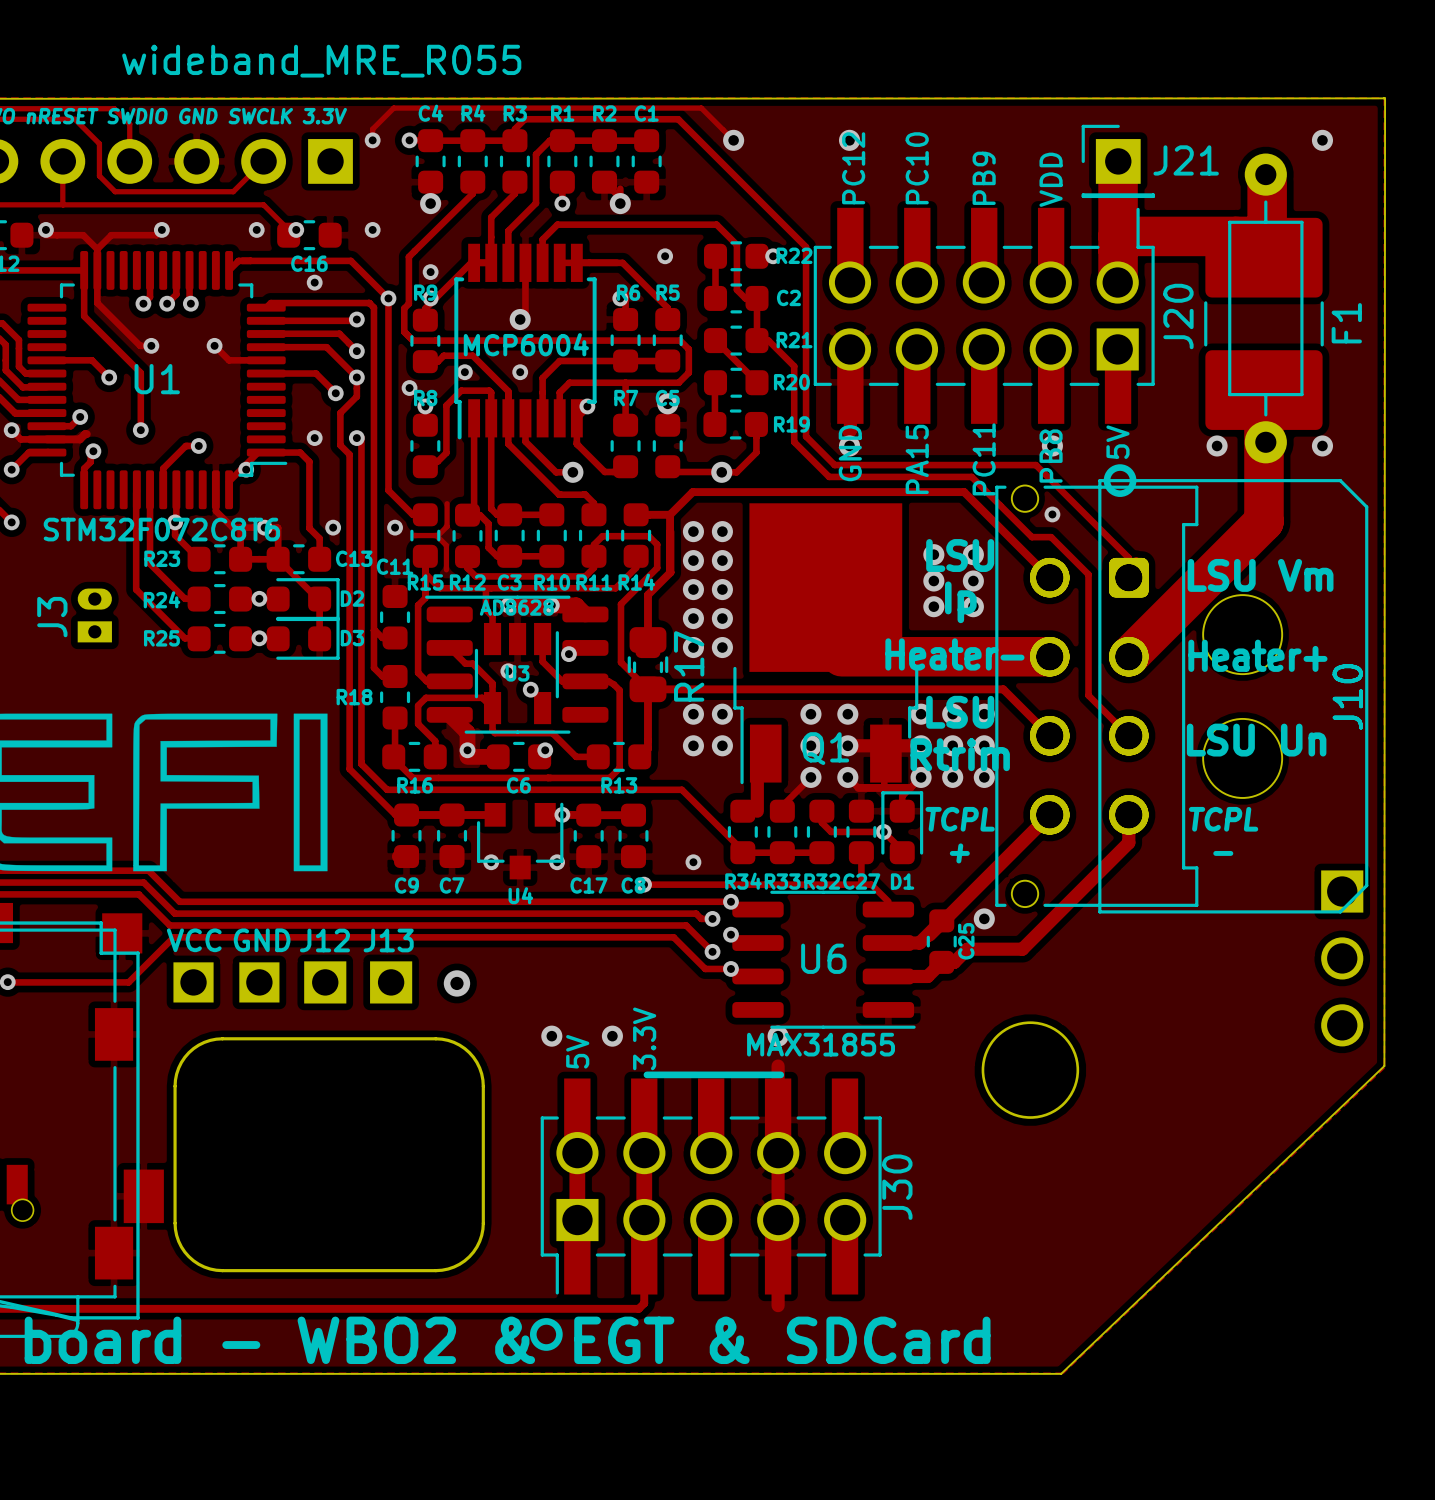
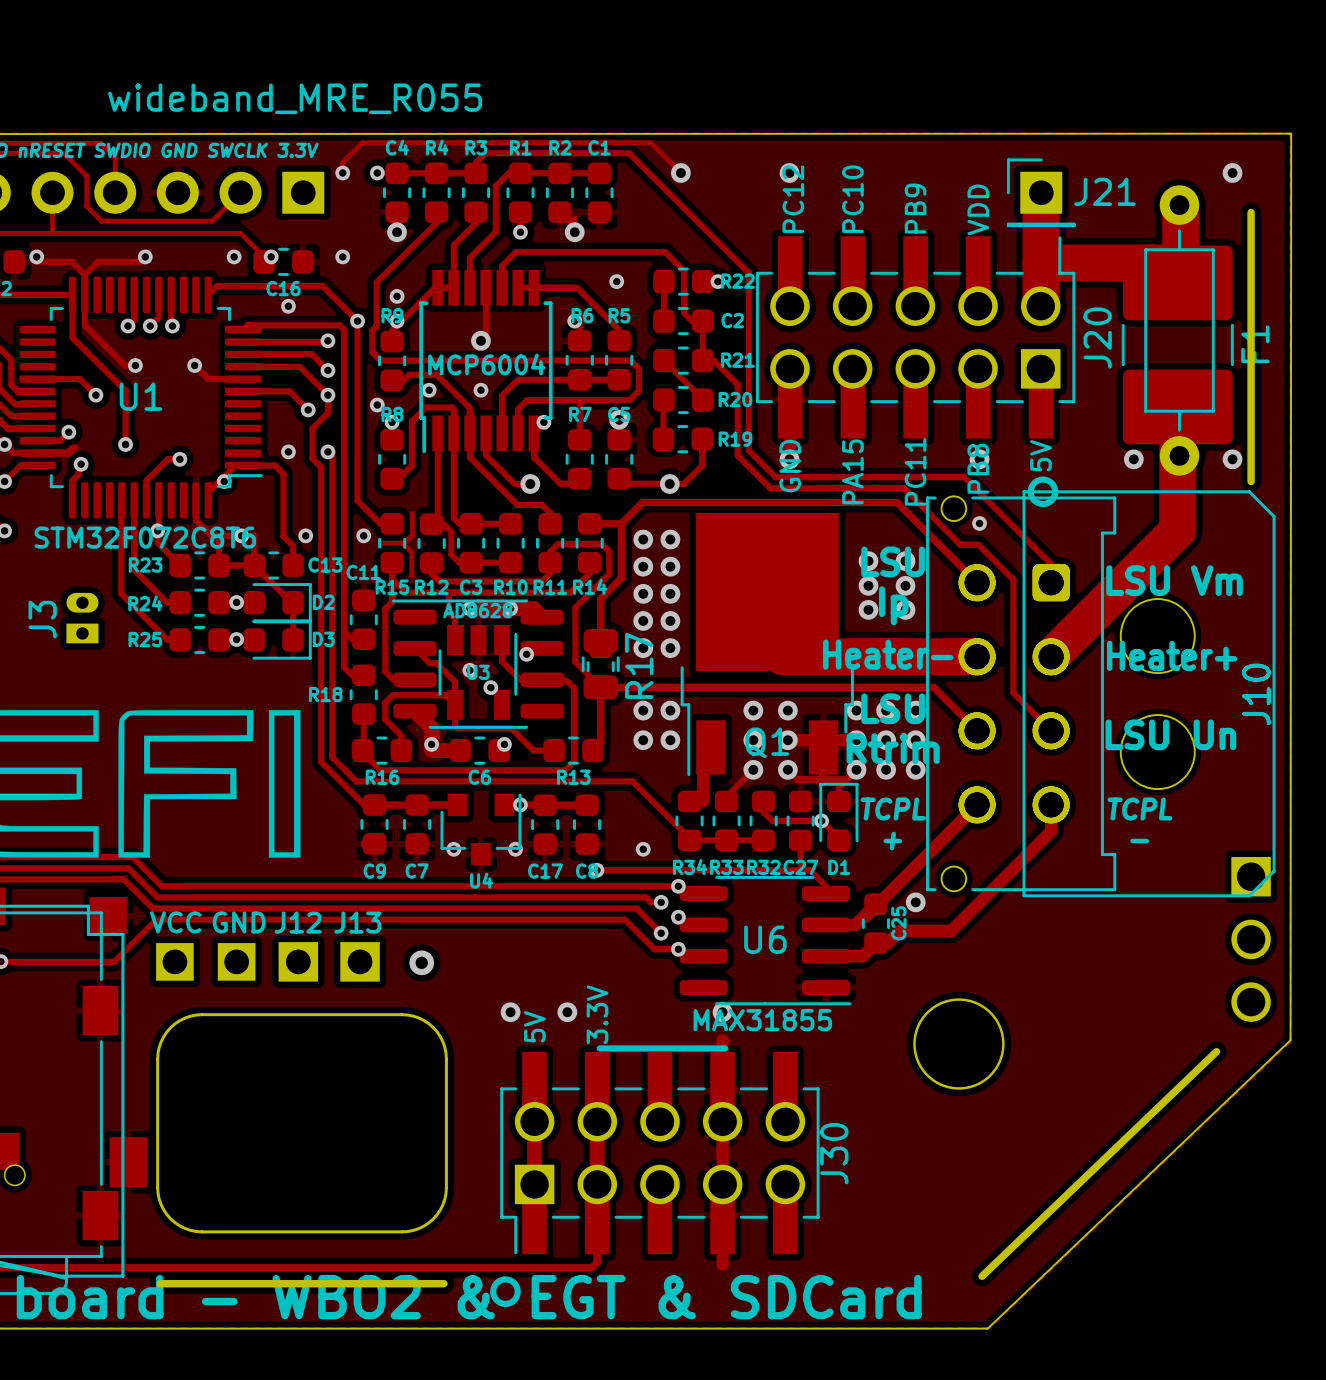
board edge: none -> (1251, 212) (1251, 481)
board edge: none -> (1216, 1051) (982, 1276)
board edge: none -> (160, 1283) (443, 1283)

